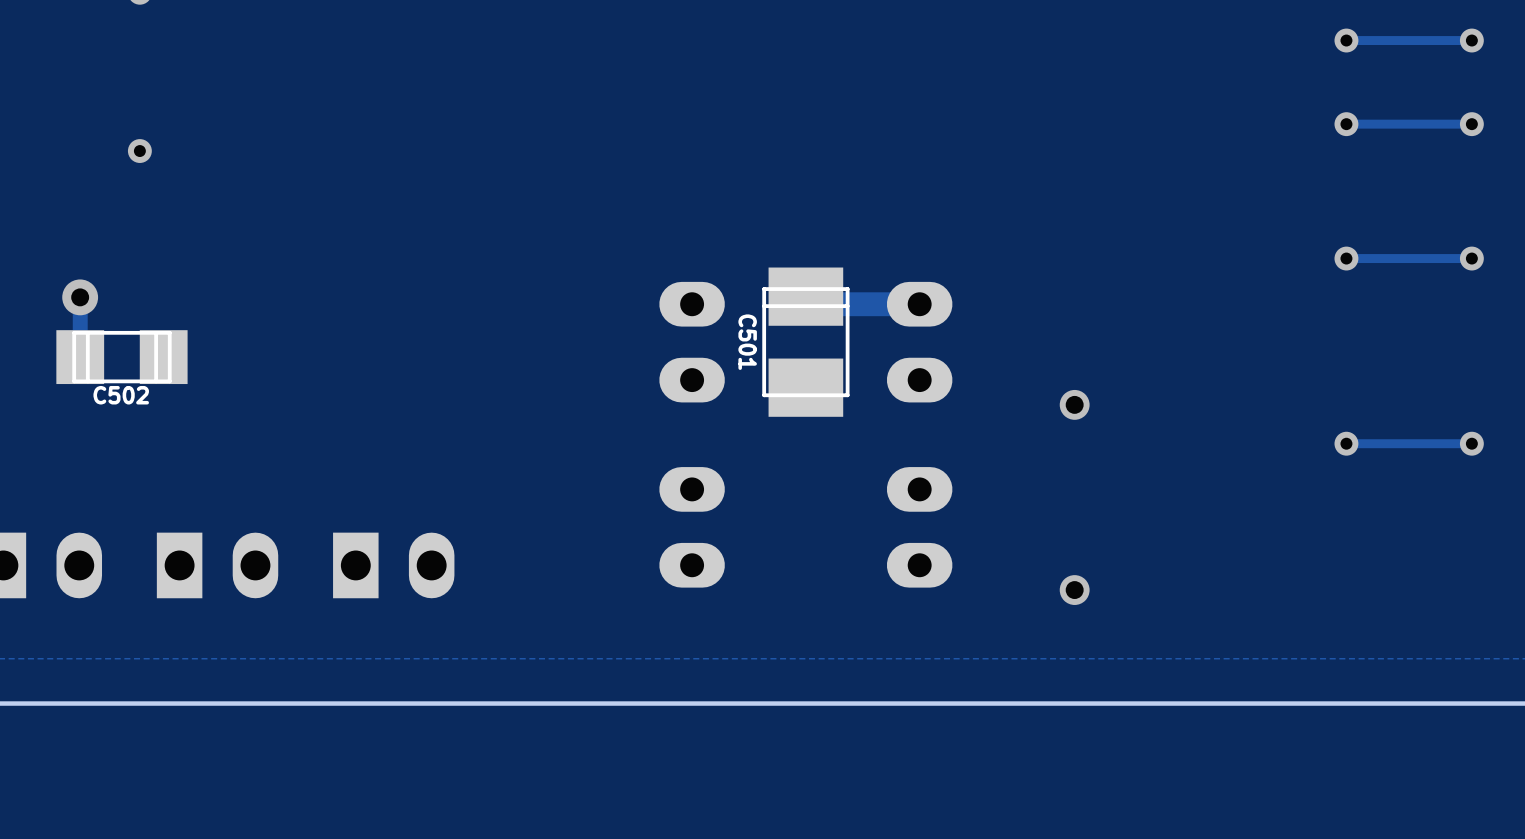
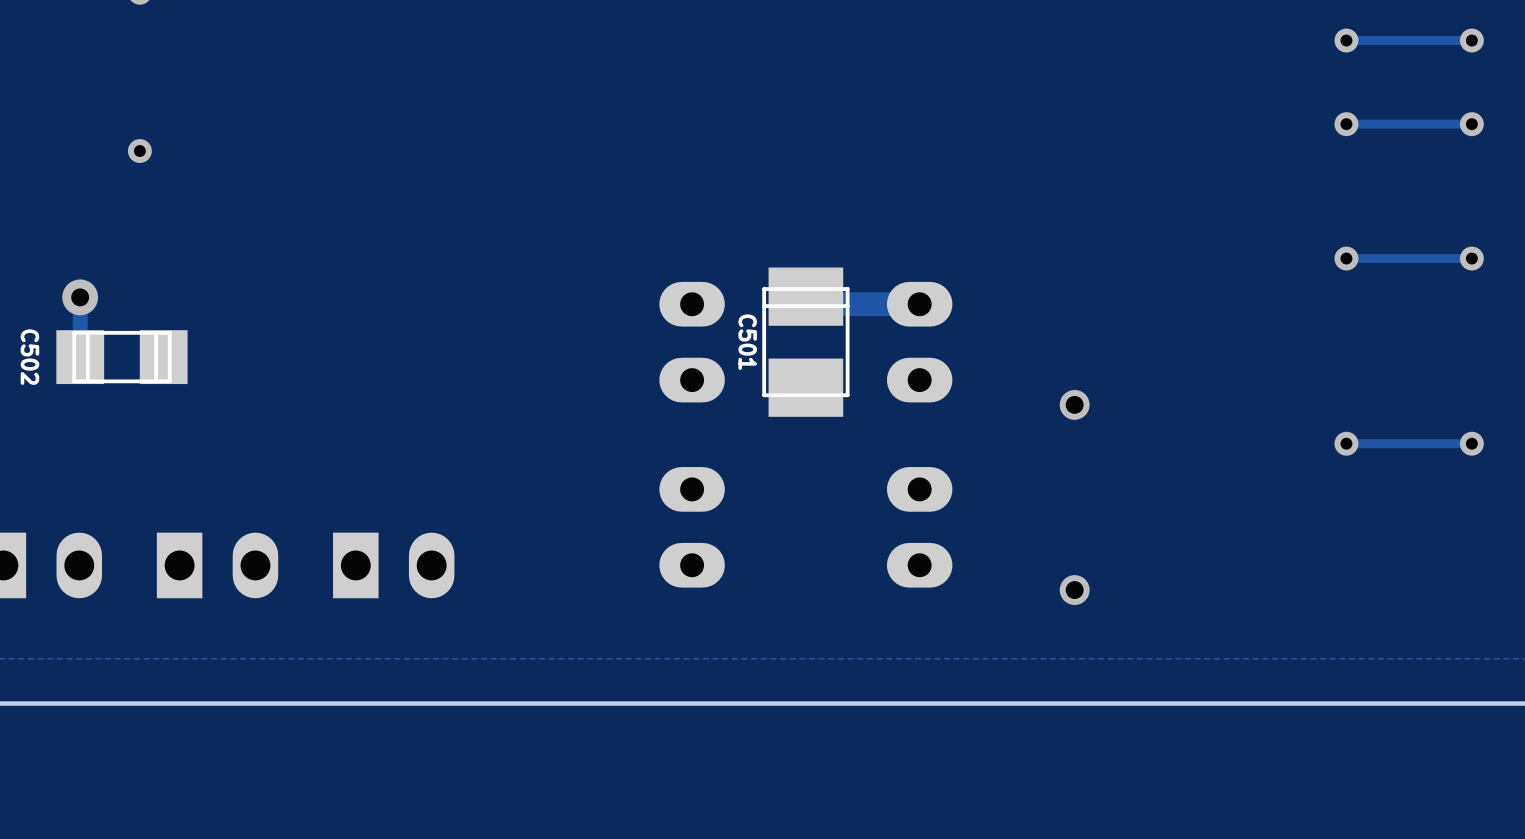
C502 name rotation: 0° (121, 395) -> 90° clockwise (29, 357)
C502 name position: C502 (121, 395) -> C502 (29, 357)

